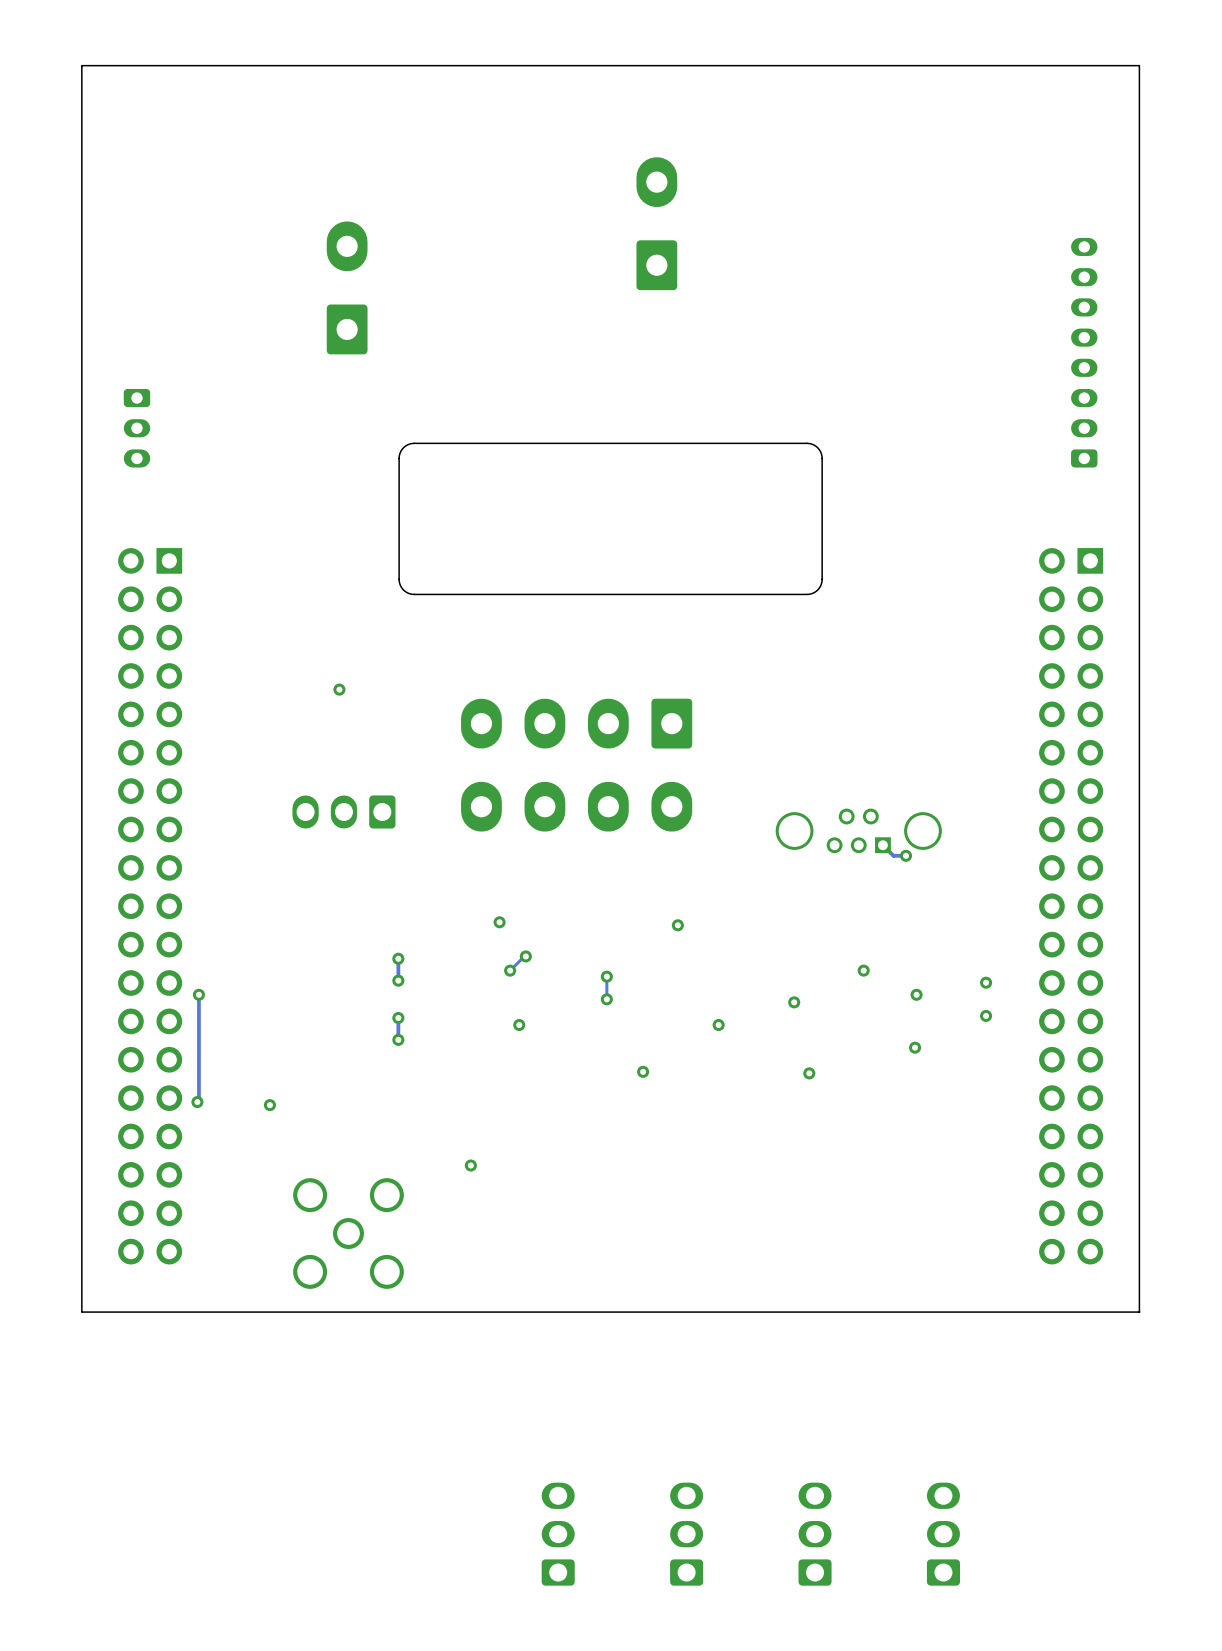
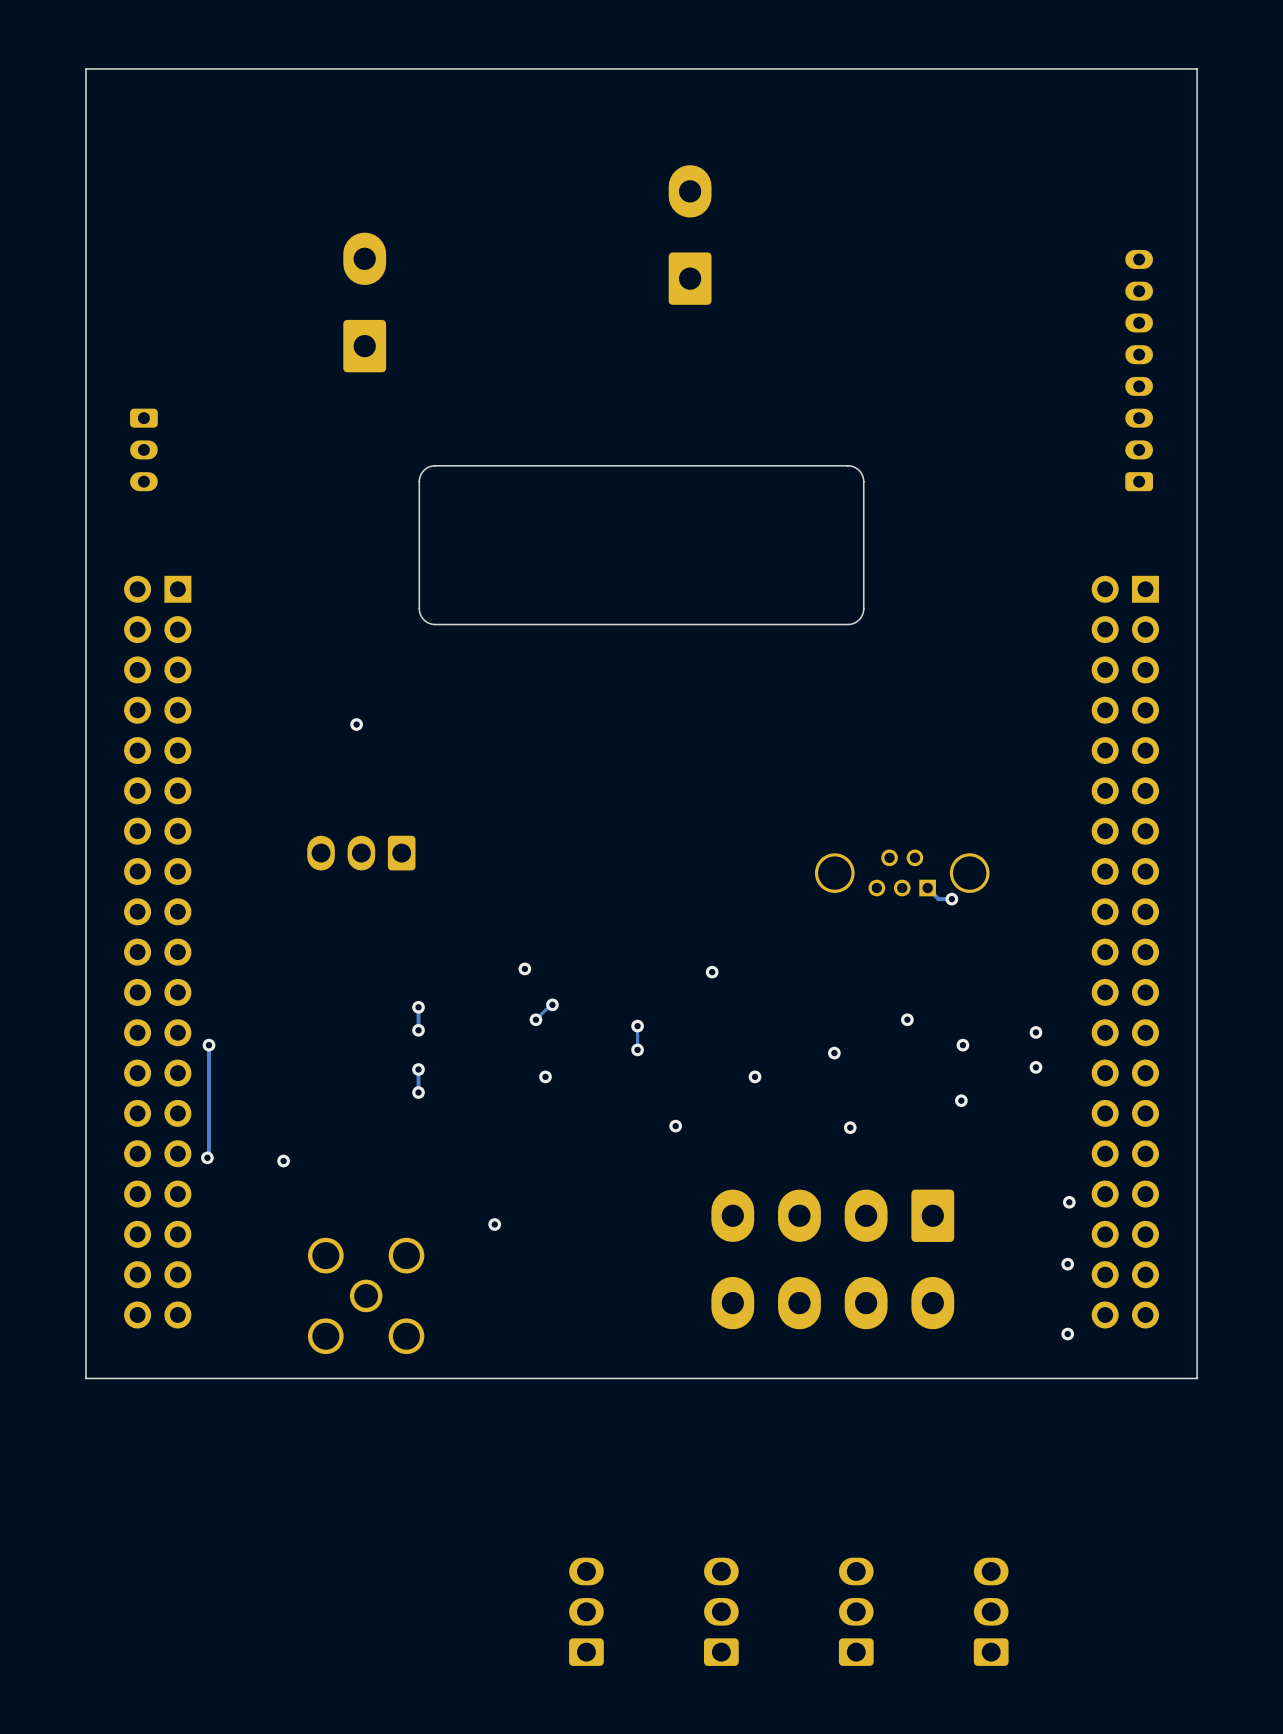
part: (576, 765) -> none
via: none -> (1069, 1202)
part: none -> (832, 1259)
via: none -> (1067, 1264)
via: none -> (1067, 1334)

